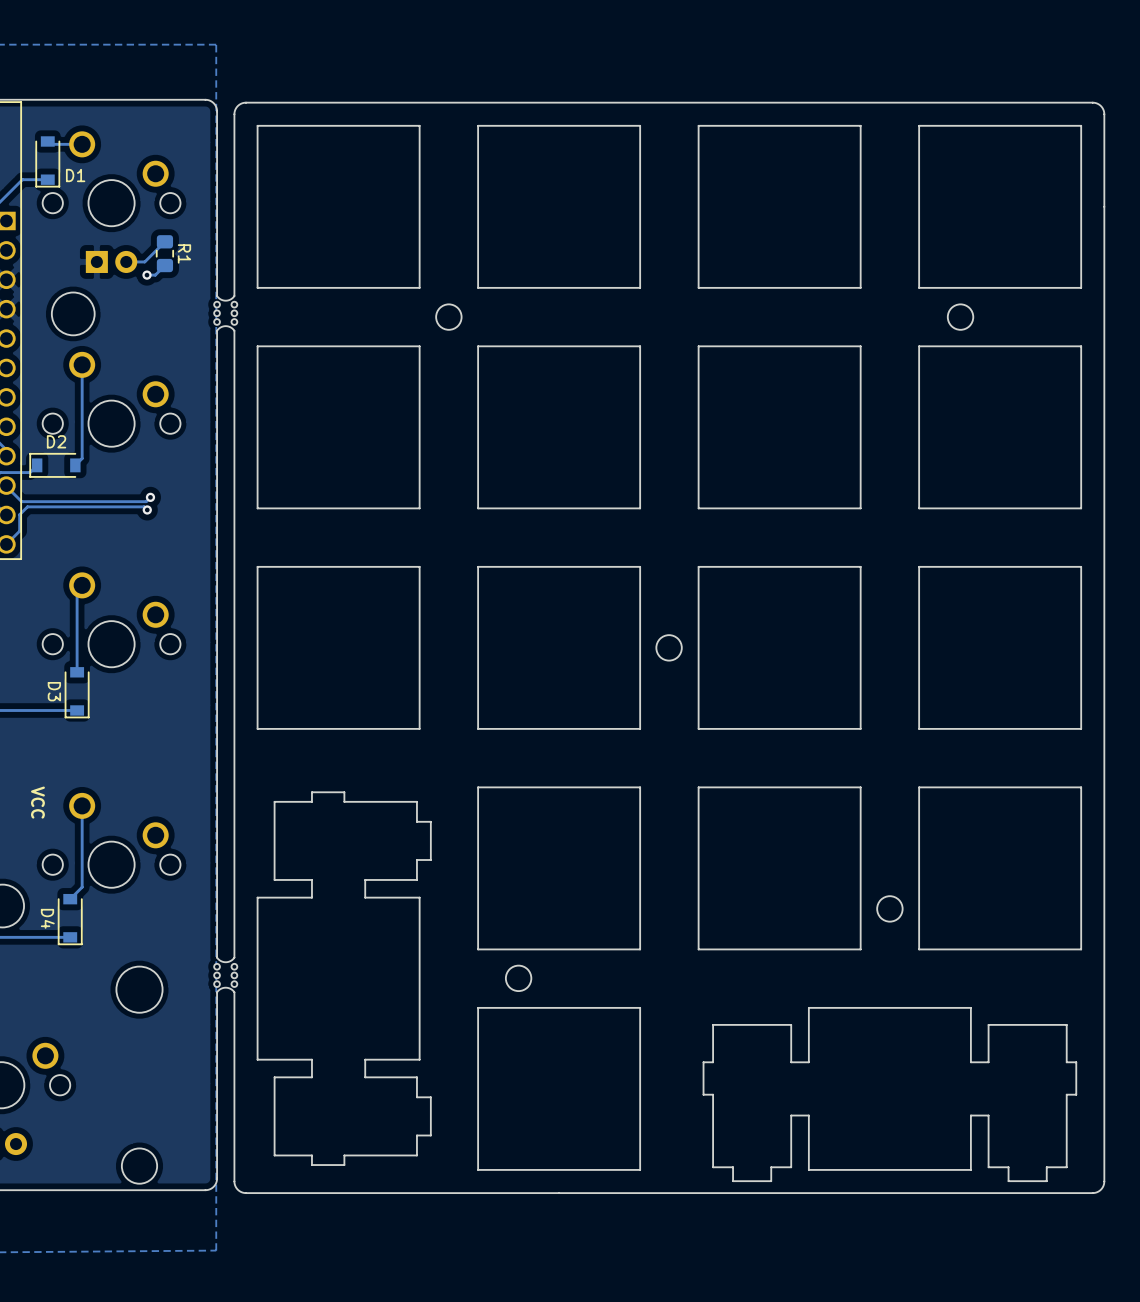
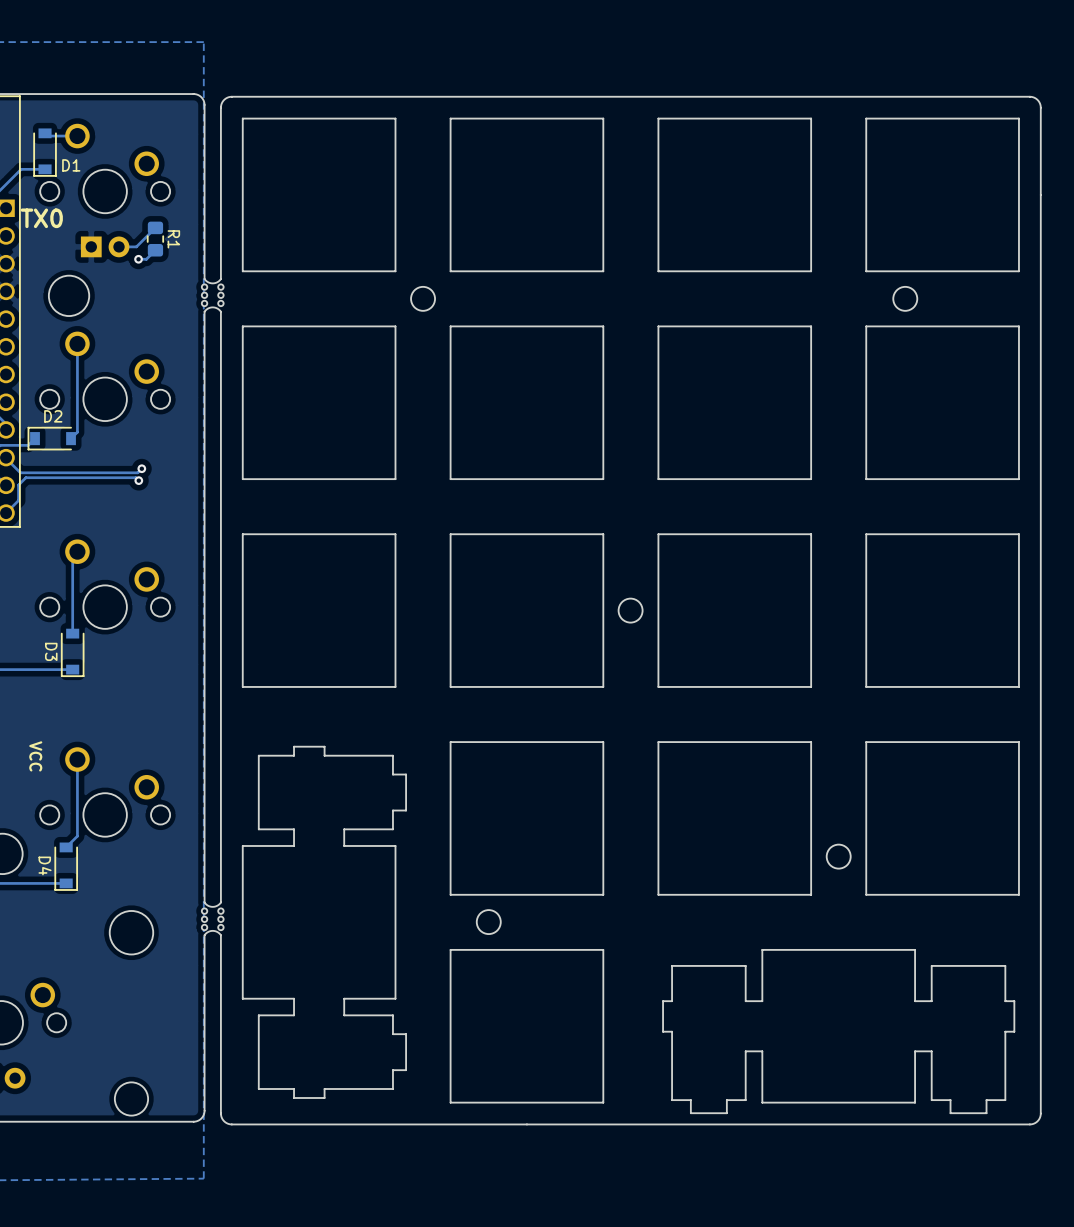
text: none -> TX0 (41, 218)

